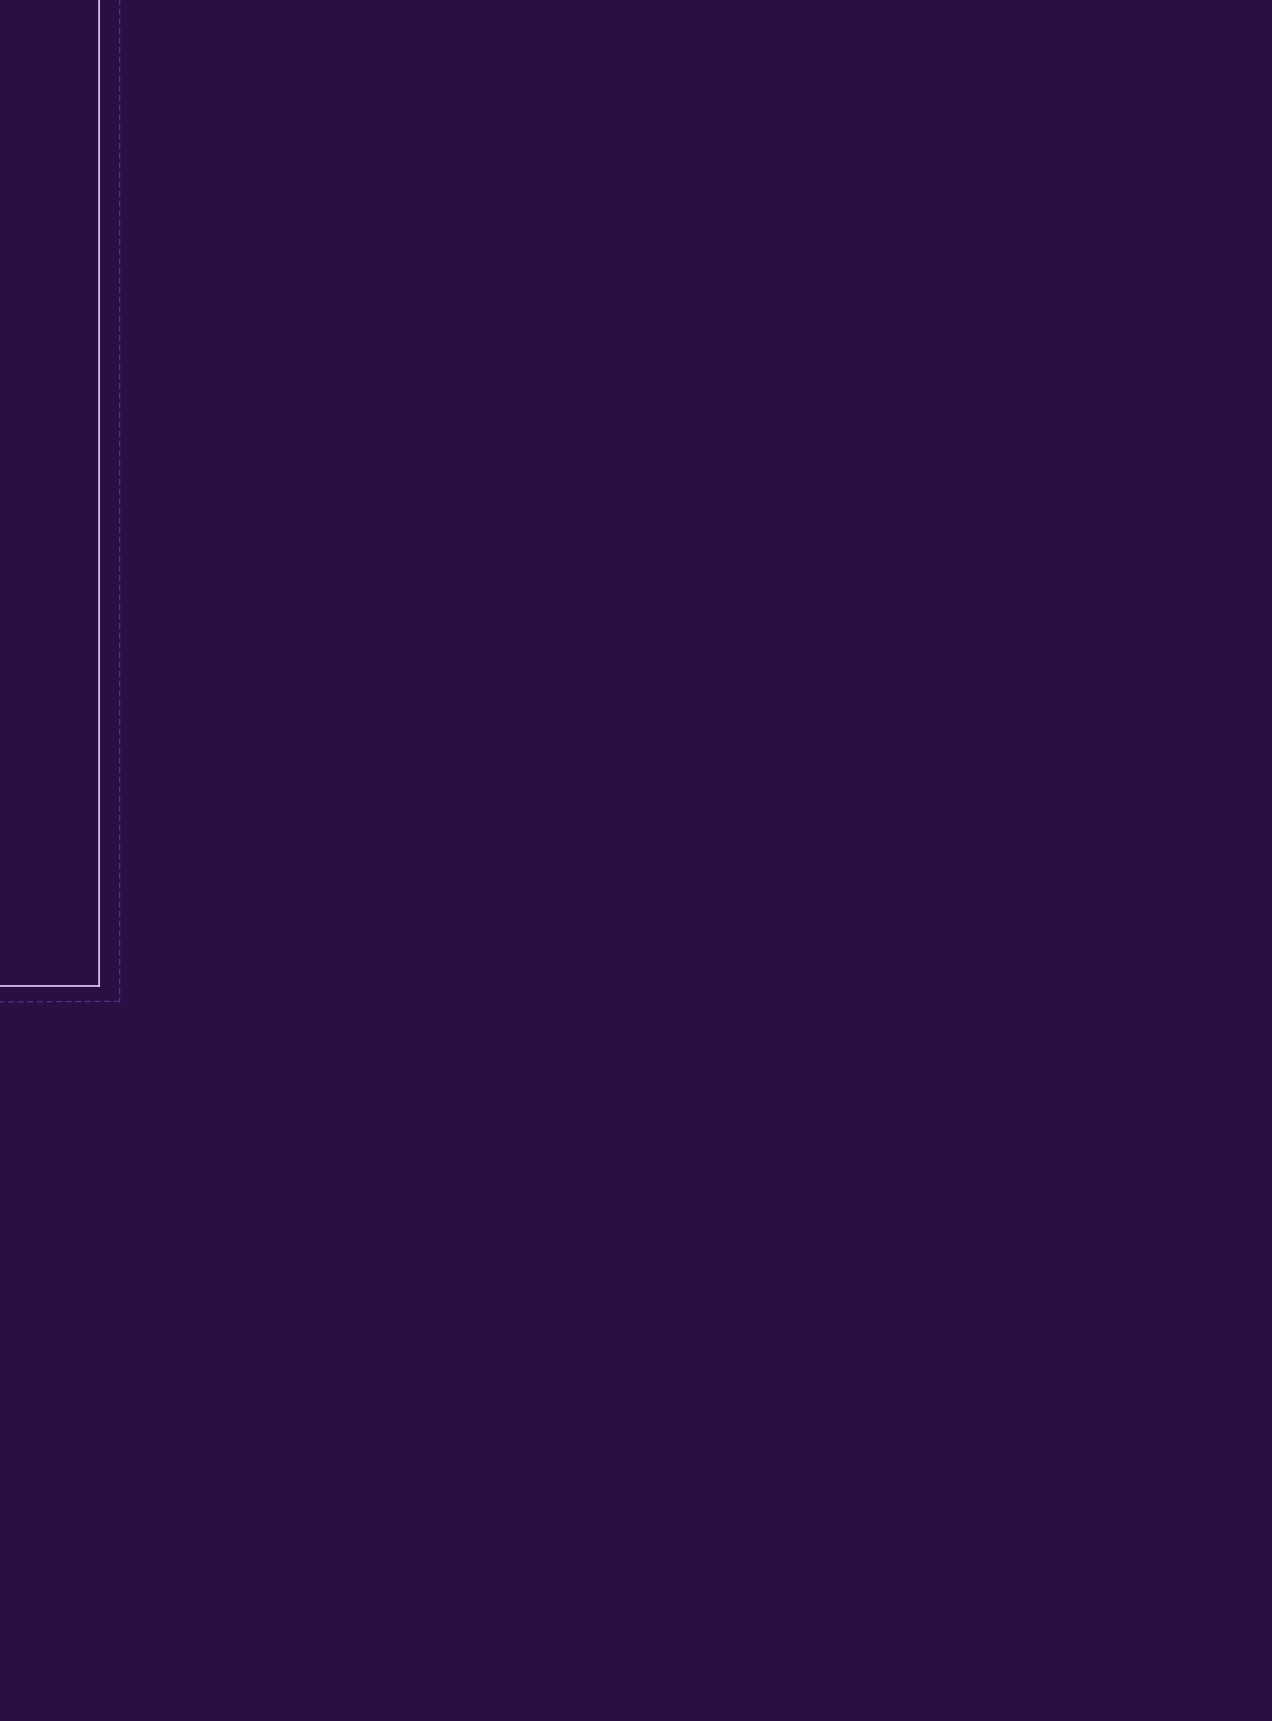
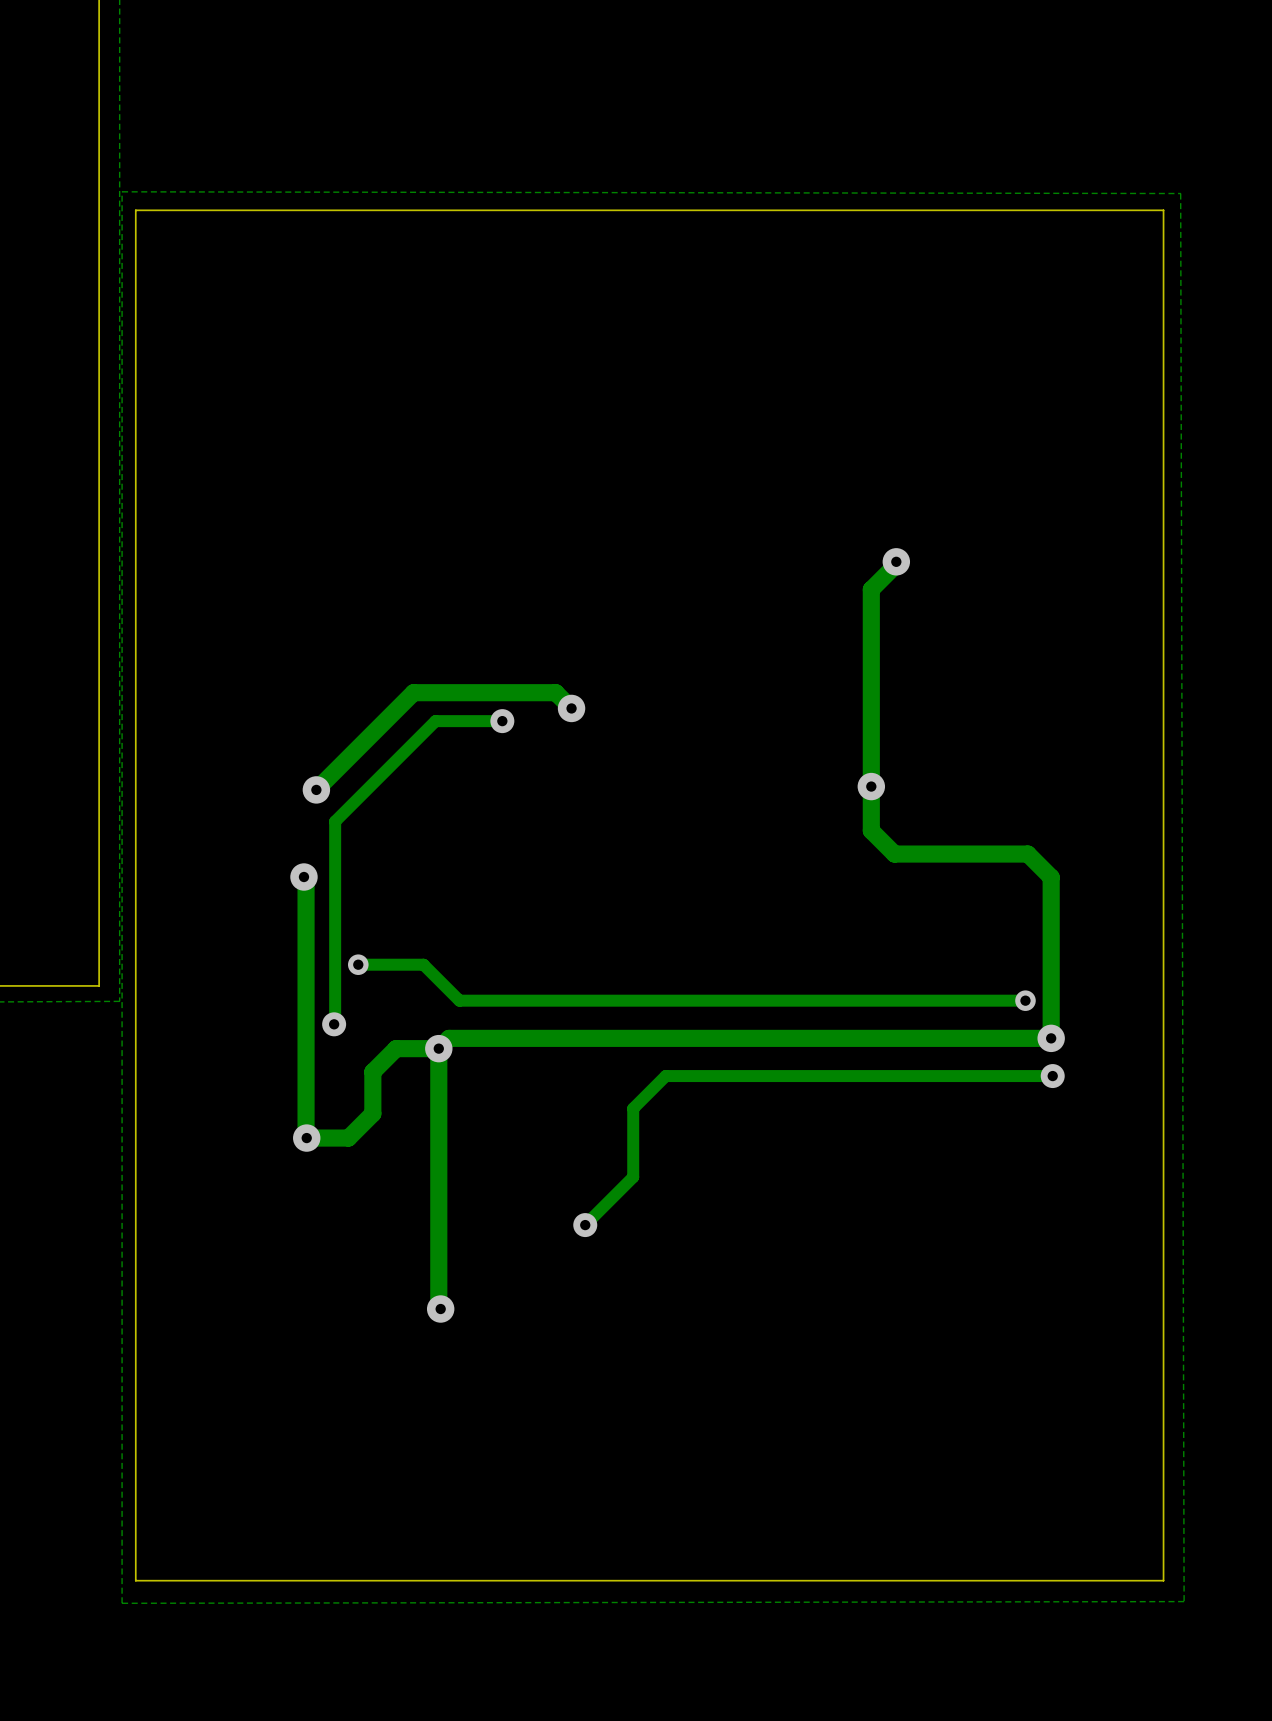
zone outline: none -> (122, 191) (1180, 193) (1184, 1601) (122, 1603) (122, 191)
board edge: none -> (1163, 210) (135, 210) (135, 1580) (1163, 1580) (1163, 210)
track: none -> (896, 561) (896, 564) (871, 589) (871, 830) (894, 854) (1027, 854) (1051, 877) (1051, 1038) (449, 1038) (438, 1048)
via: none -> (896, 561)
track: none -> (571, 708) (555, 692) (413, 692) (316, 789)
via: none -> (571, 708)
track: none -> (502, 721) (435, 721) (335, 821) (334, 1024)
via: none -> (502, 721)
via: none -> (871, 786)
via: none -> (316, 789)
track: none -> (303, 877) (306, 879) (306, 1137) (348, 1138) (372, 1113) (372, 1071) (396, 1048) (438, 1048)
via: none -> (303, 877)
track: none -> (358, 964) (423, 964) (459, 1000) (1025, 1000)
via: none -> (358, 964)
via: none -> (1025, 1000)
via: none -> (334, 1024)
via: none -> (1051, 1038)
track: none -> (438, 1048) (438, 1307) (440, 1309)
via: none -> (438, 1048)
track: none -> (1052, 1076) (665, 1076) (633, 1108) (633, 1177) (585, 1225)
via: none -> (1052, 1076)
via: none -> (306, 1138)
via: none -> (585, 1225)
via: none -> (440, 1309)

